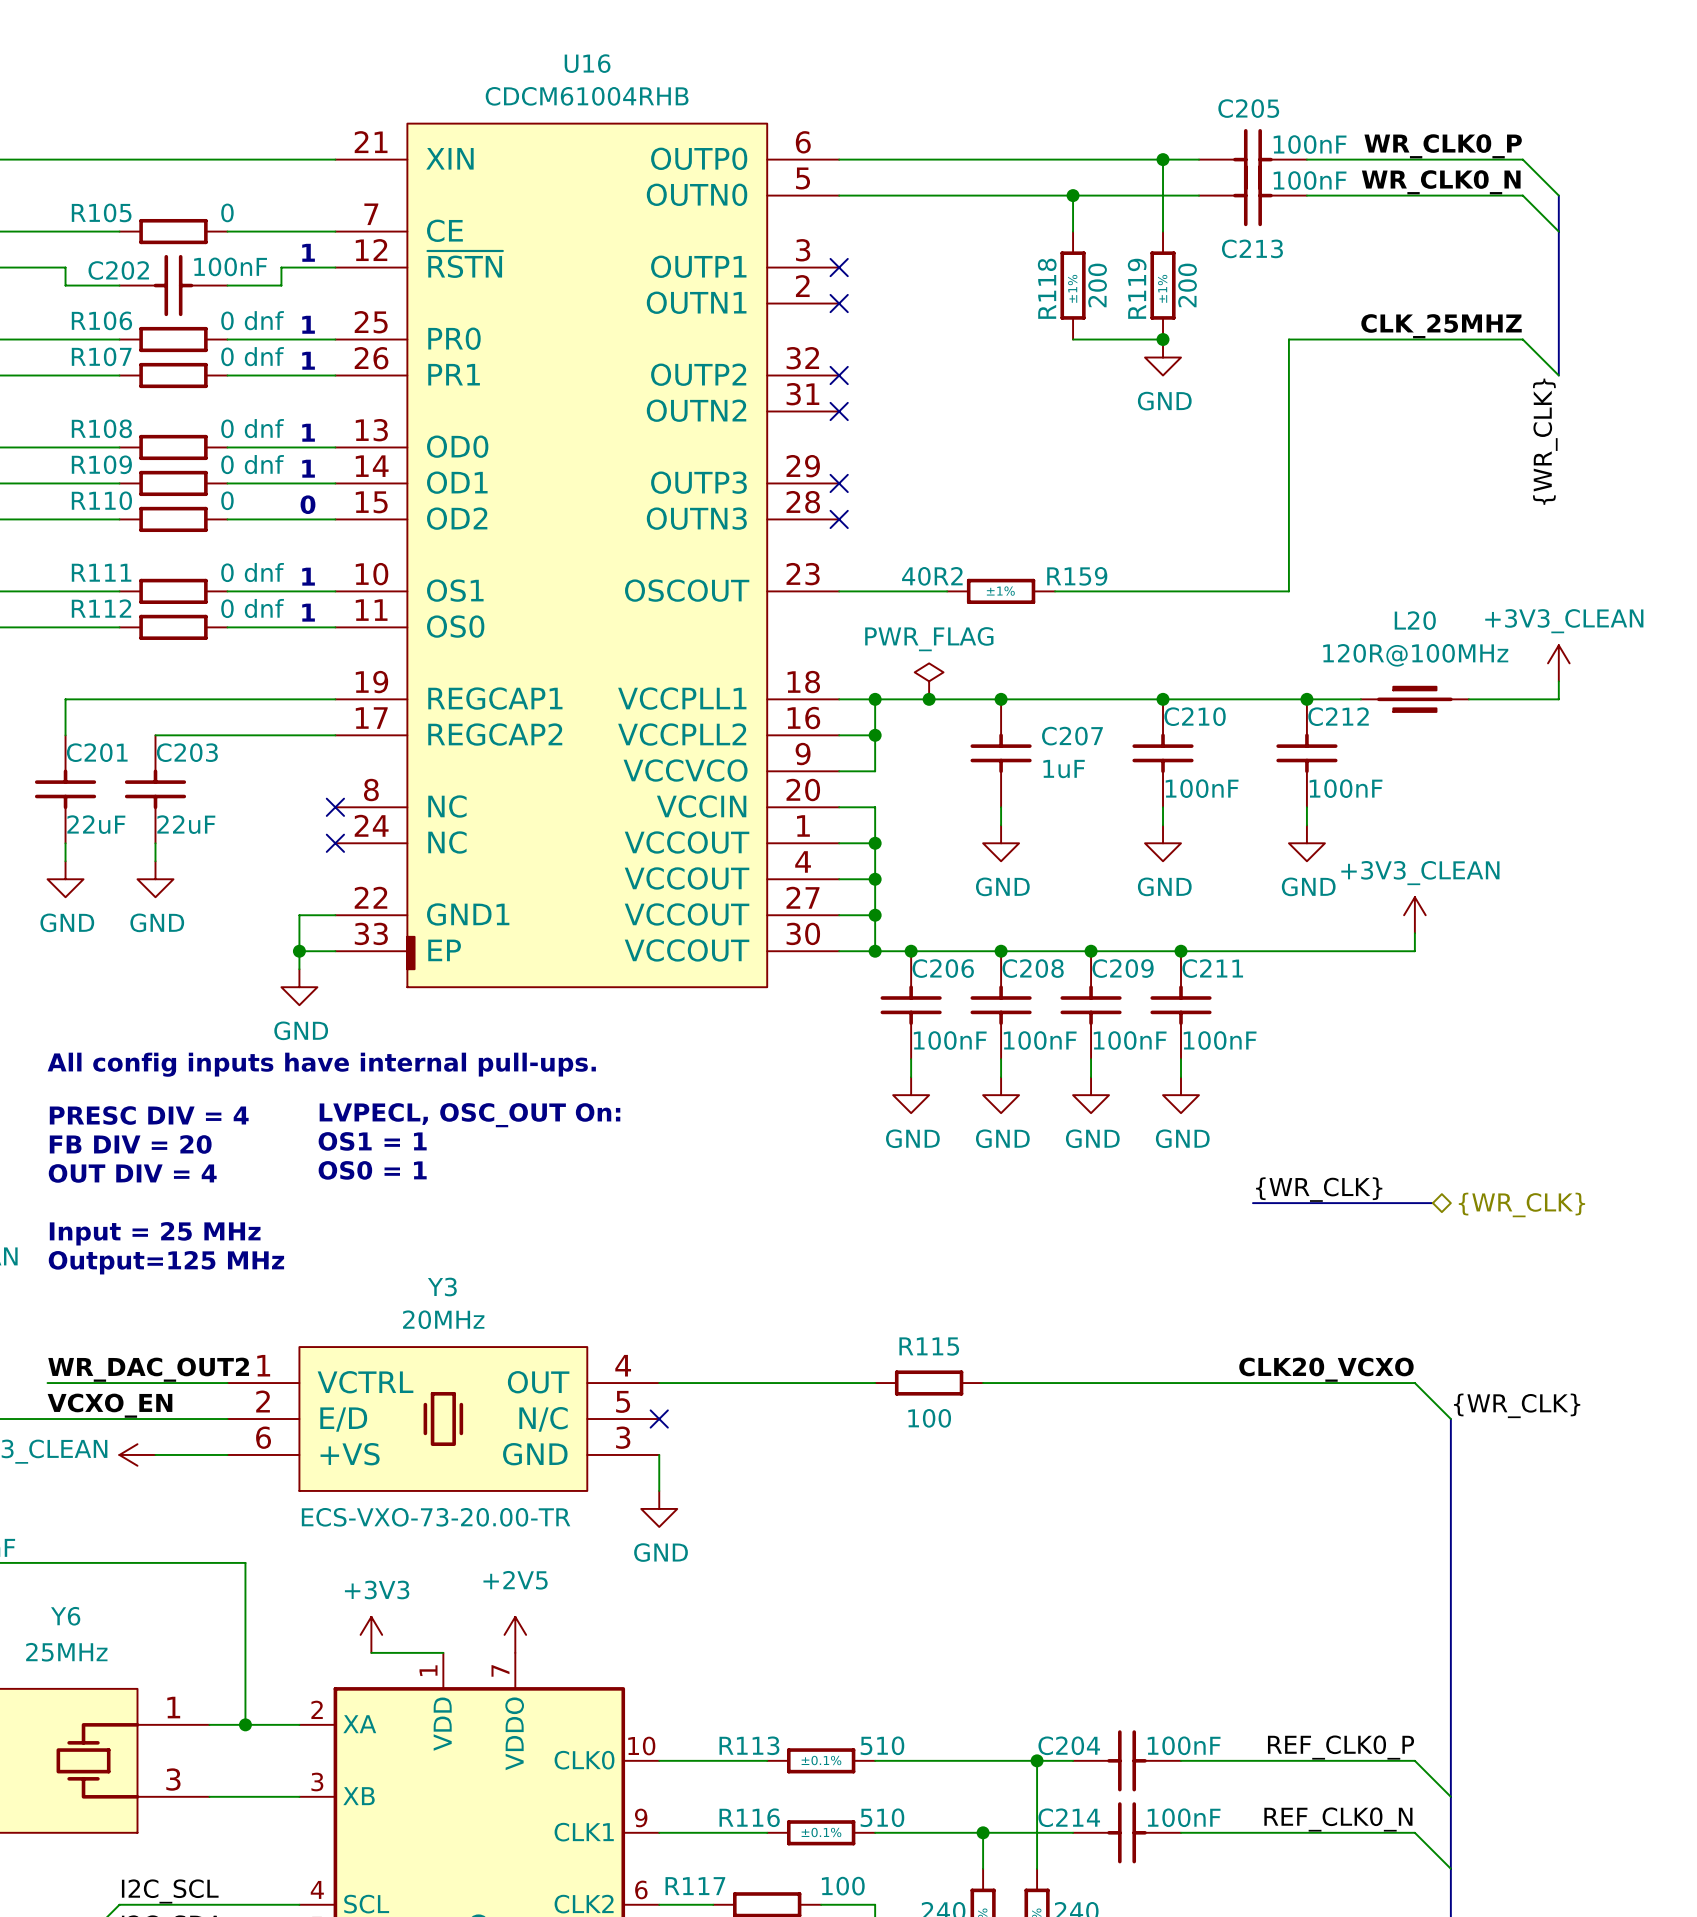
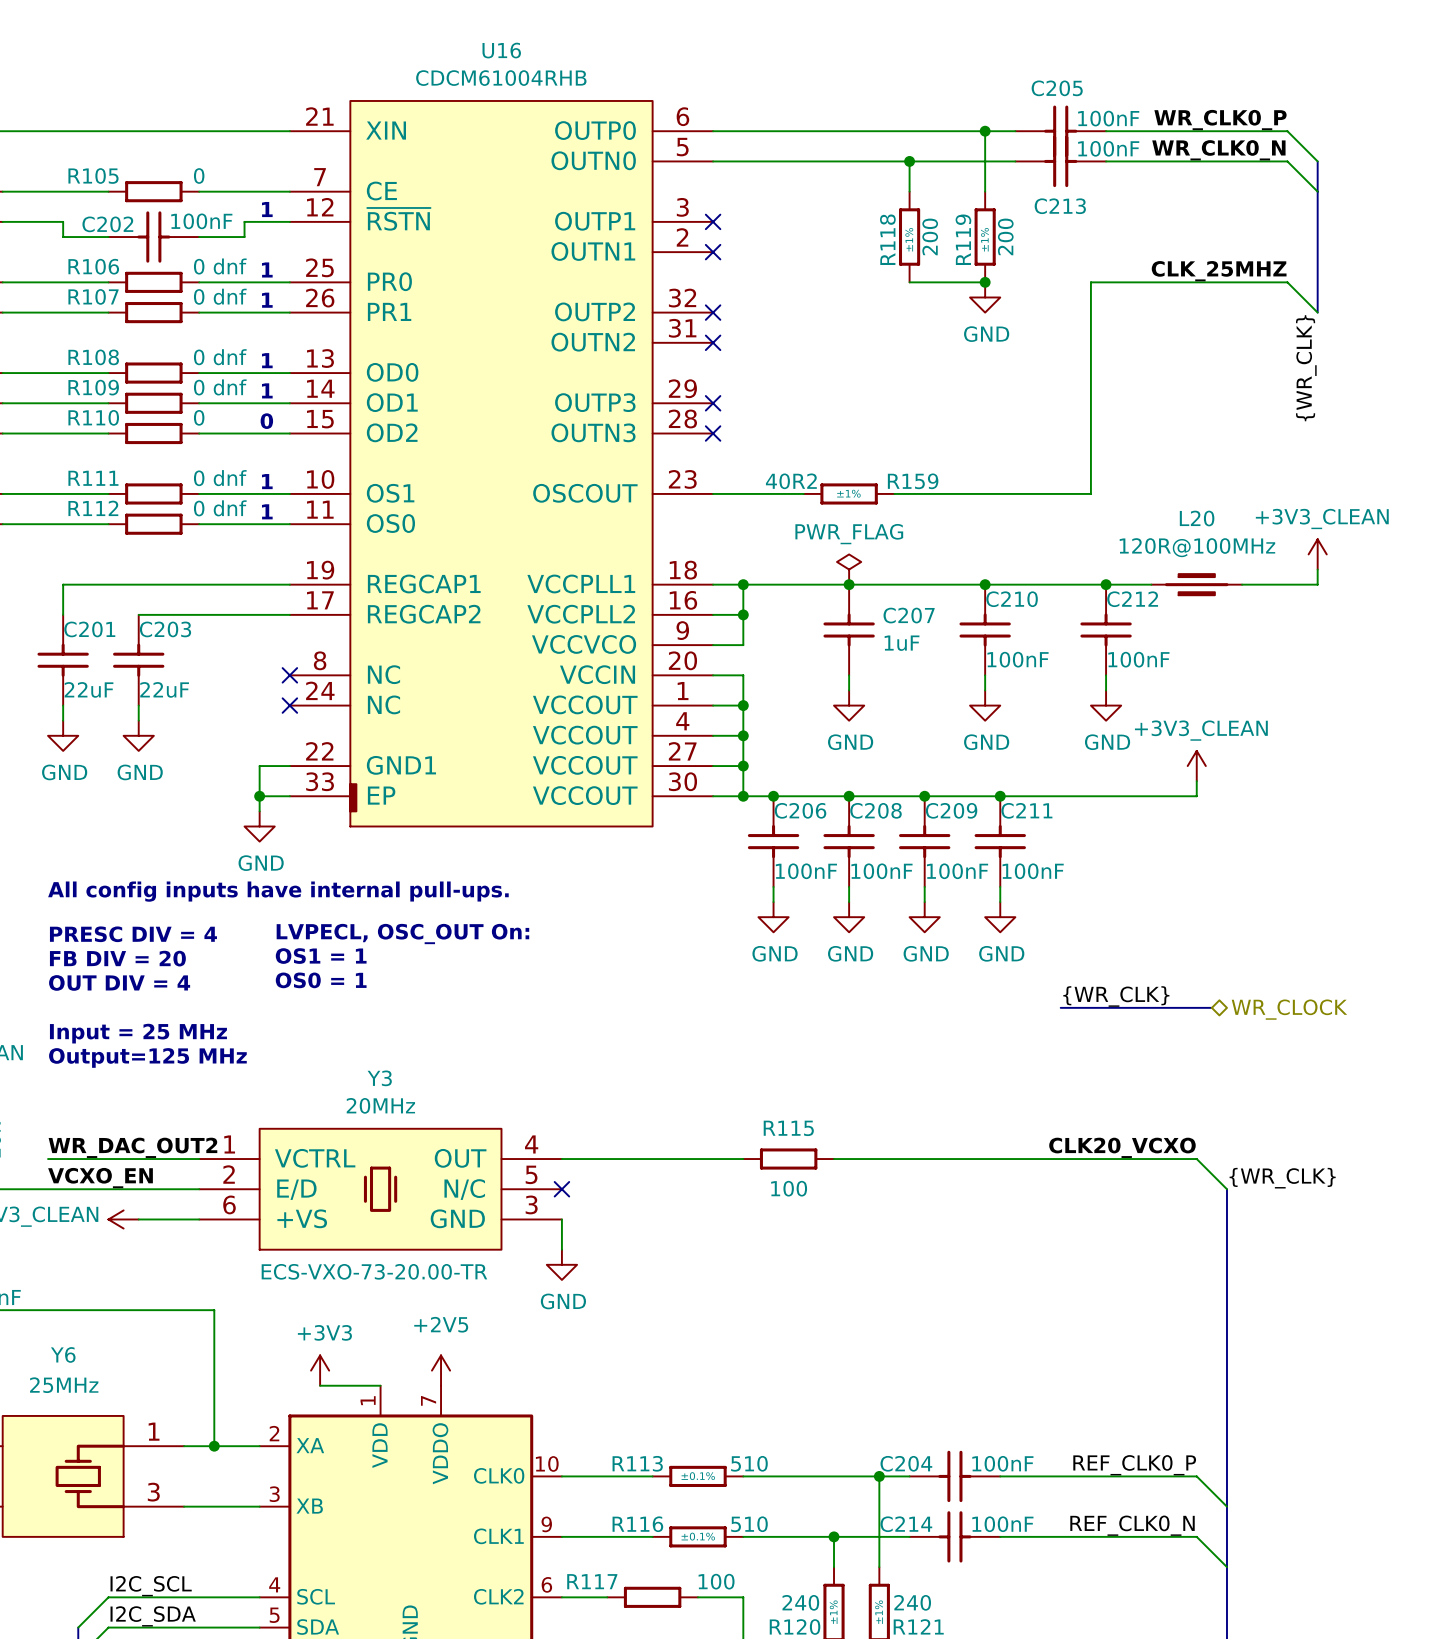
power symbol position: PWR_FLAG (929, 681) -> PWR_FLAG (849, 569)
junction: (929, 699) -> none
hierarchical label: {WR_CLK} (1521, 1204) -> WR_CLOCK (1289, 1009)

